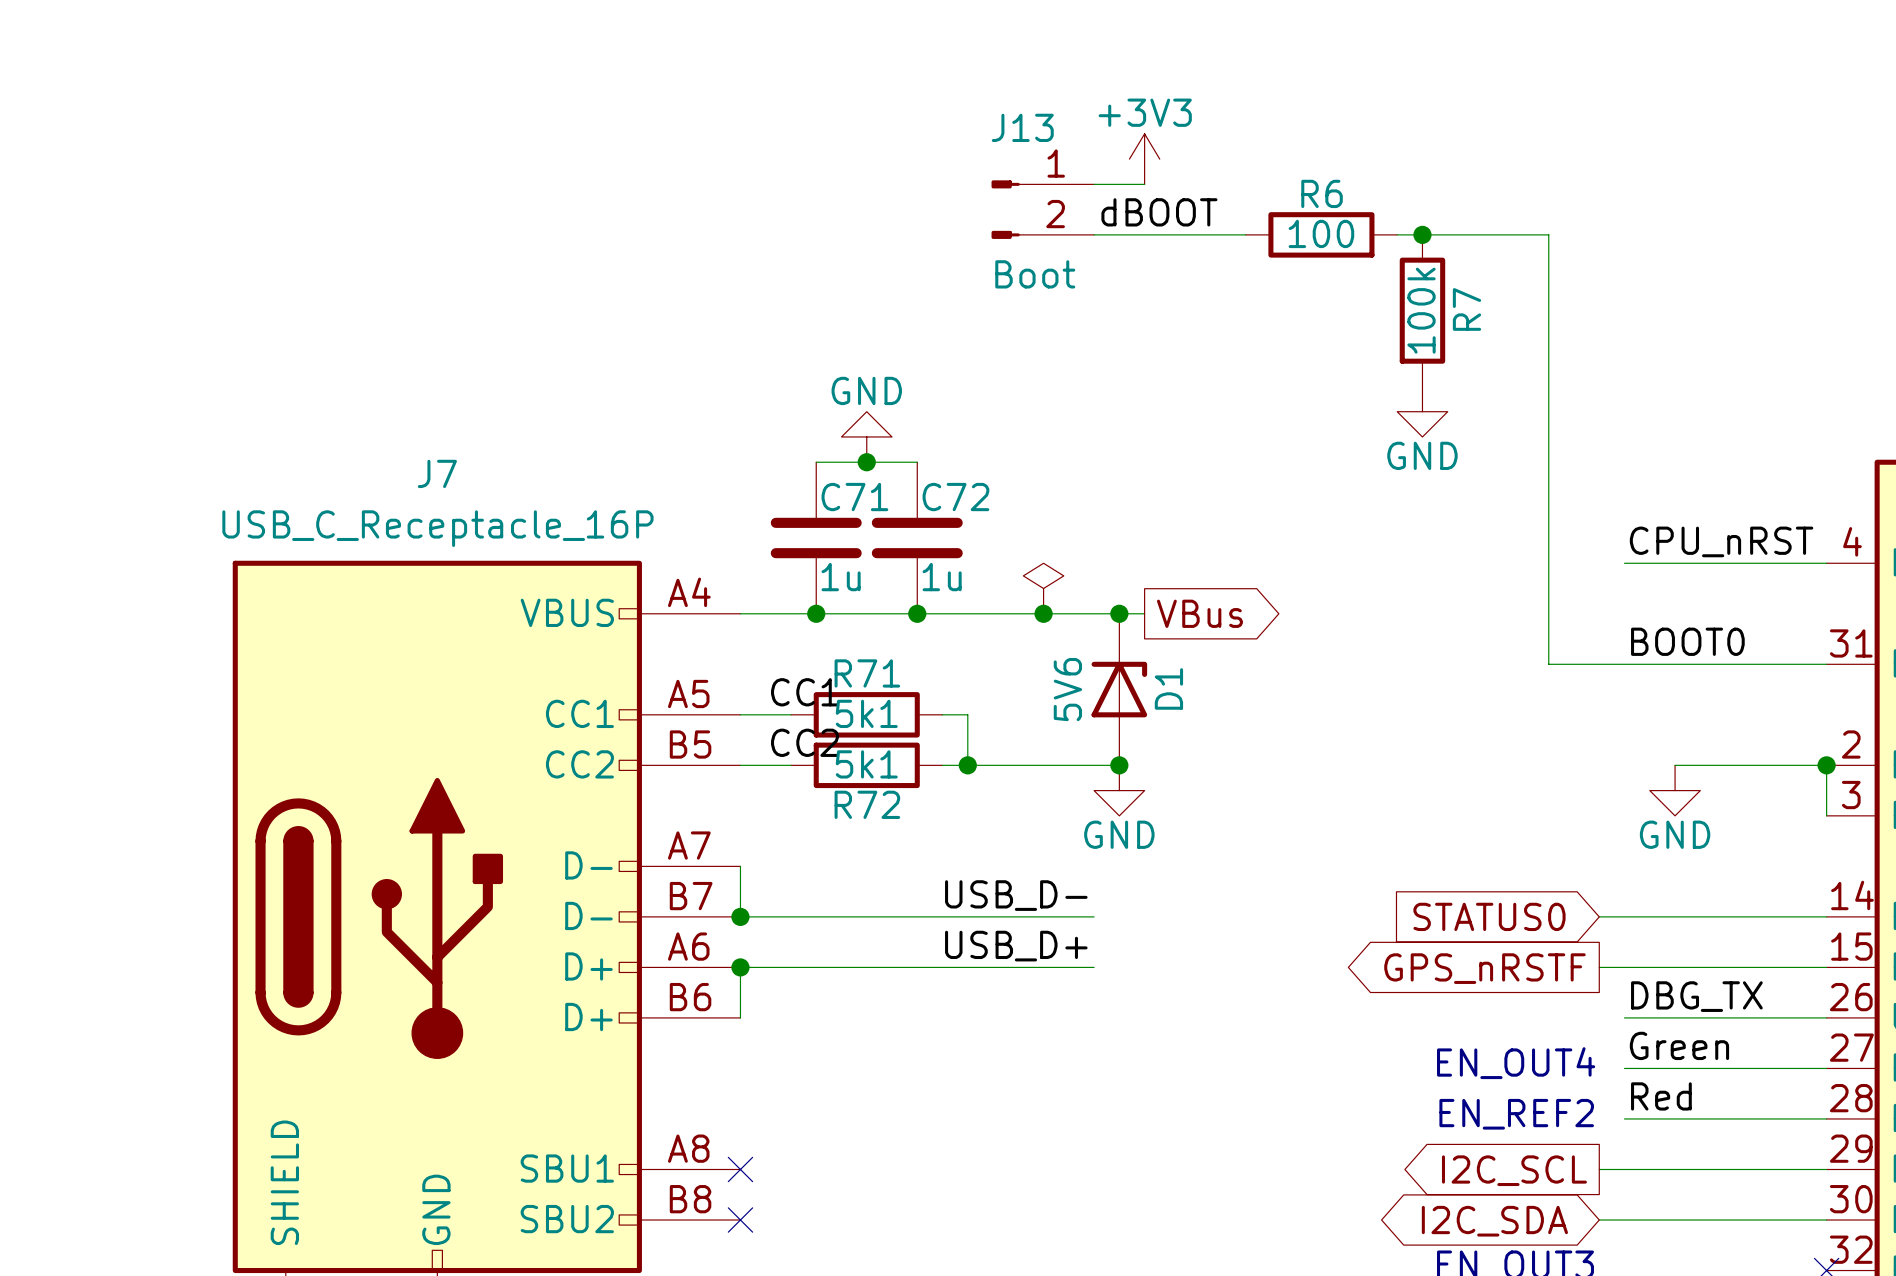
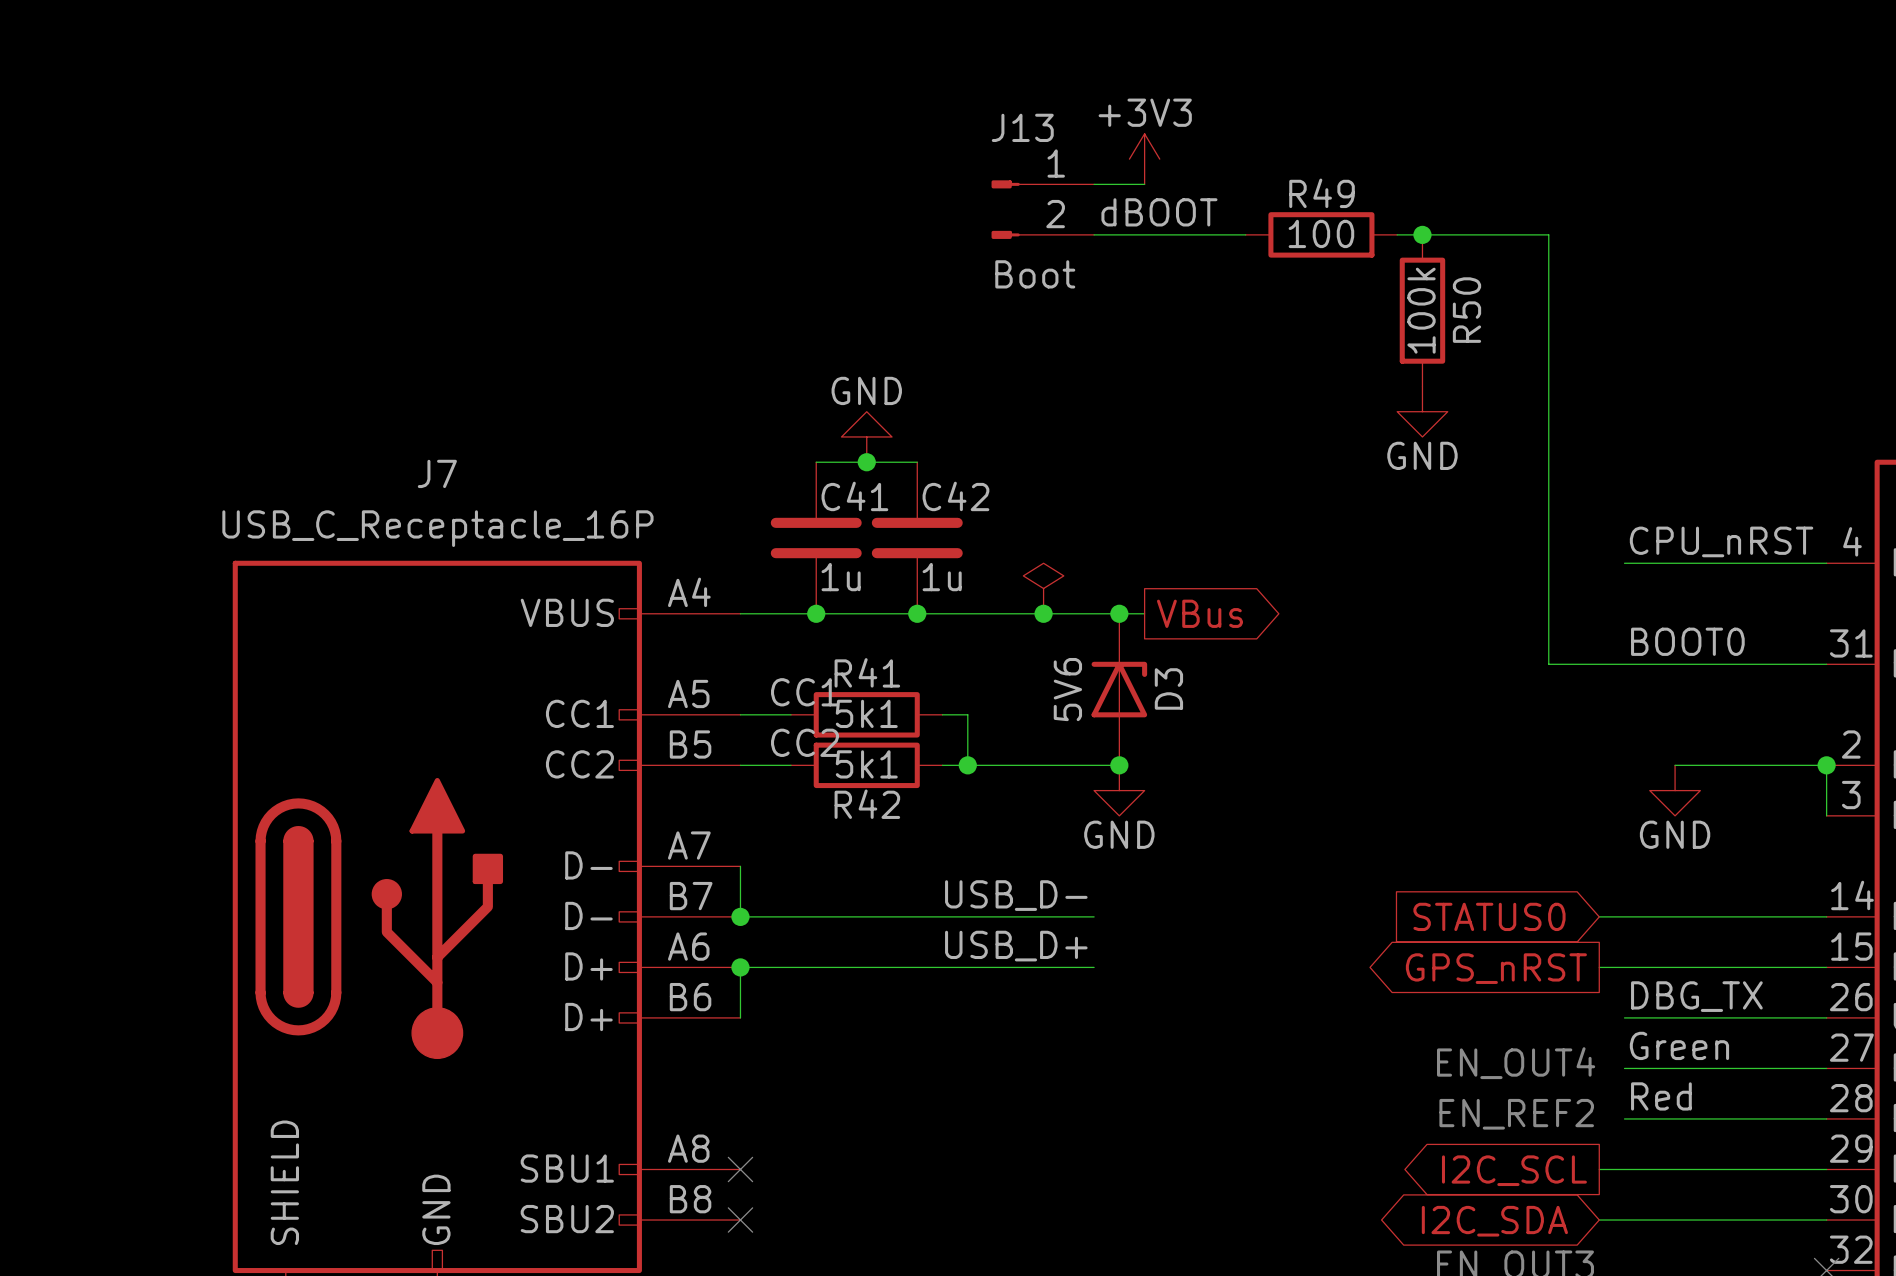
R6 name: R6 (1322, 193) -> R49 (1322, 193)
R7 name: R7 (1466, 309) -> R50 (1466, 310)
C71 name: C71 (854, 497) -> C41 (854, 496)
C72 name: C72 (955, 497) -> C42 (955, 496)
R71 name: R71 (867, 673) -> R41 (867, 672)
D1 name: D1 (1168, 688) -> D3 (1168, 688)
R72 name: R72 (867, 804) -> R42 (867, 804)
global label: GPS_nRSTF (1484, 968) -> GPS_nRST (1496, 968)

